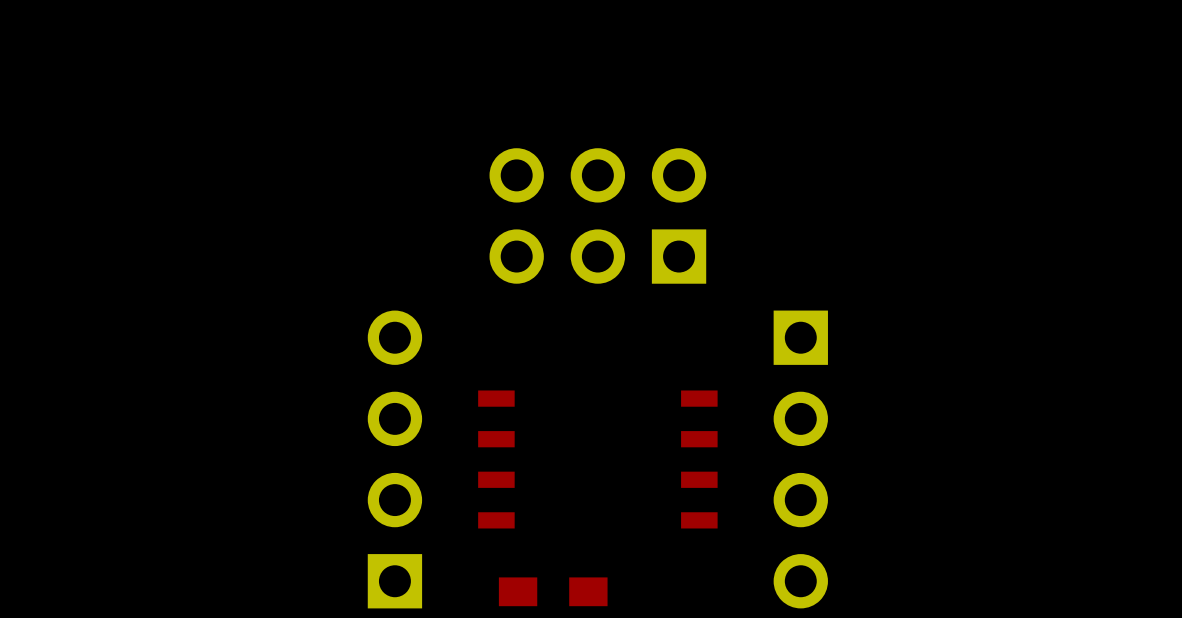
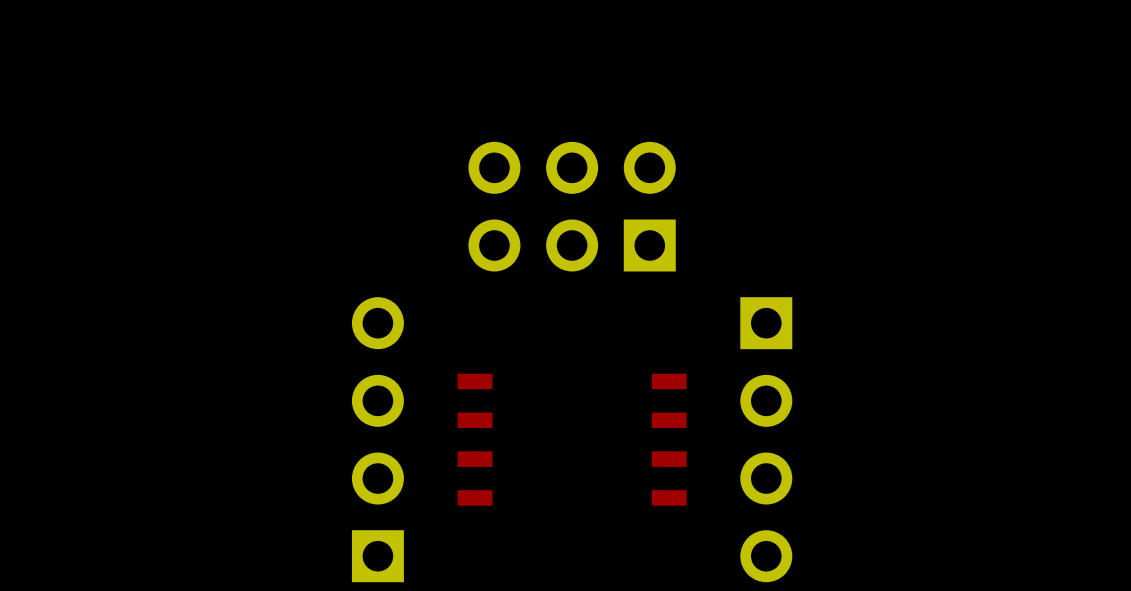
part: (553, 591) -> none

